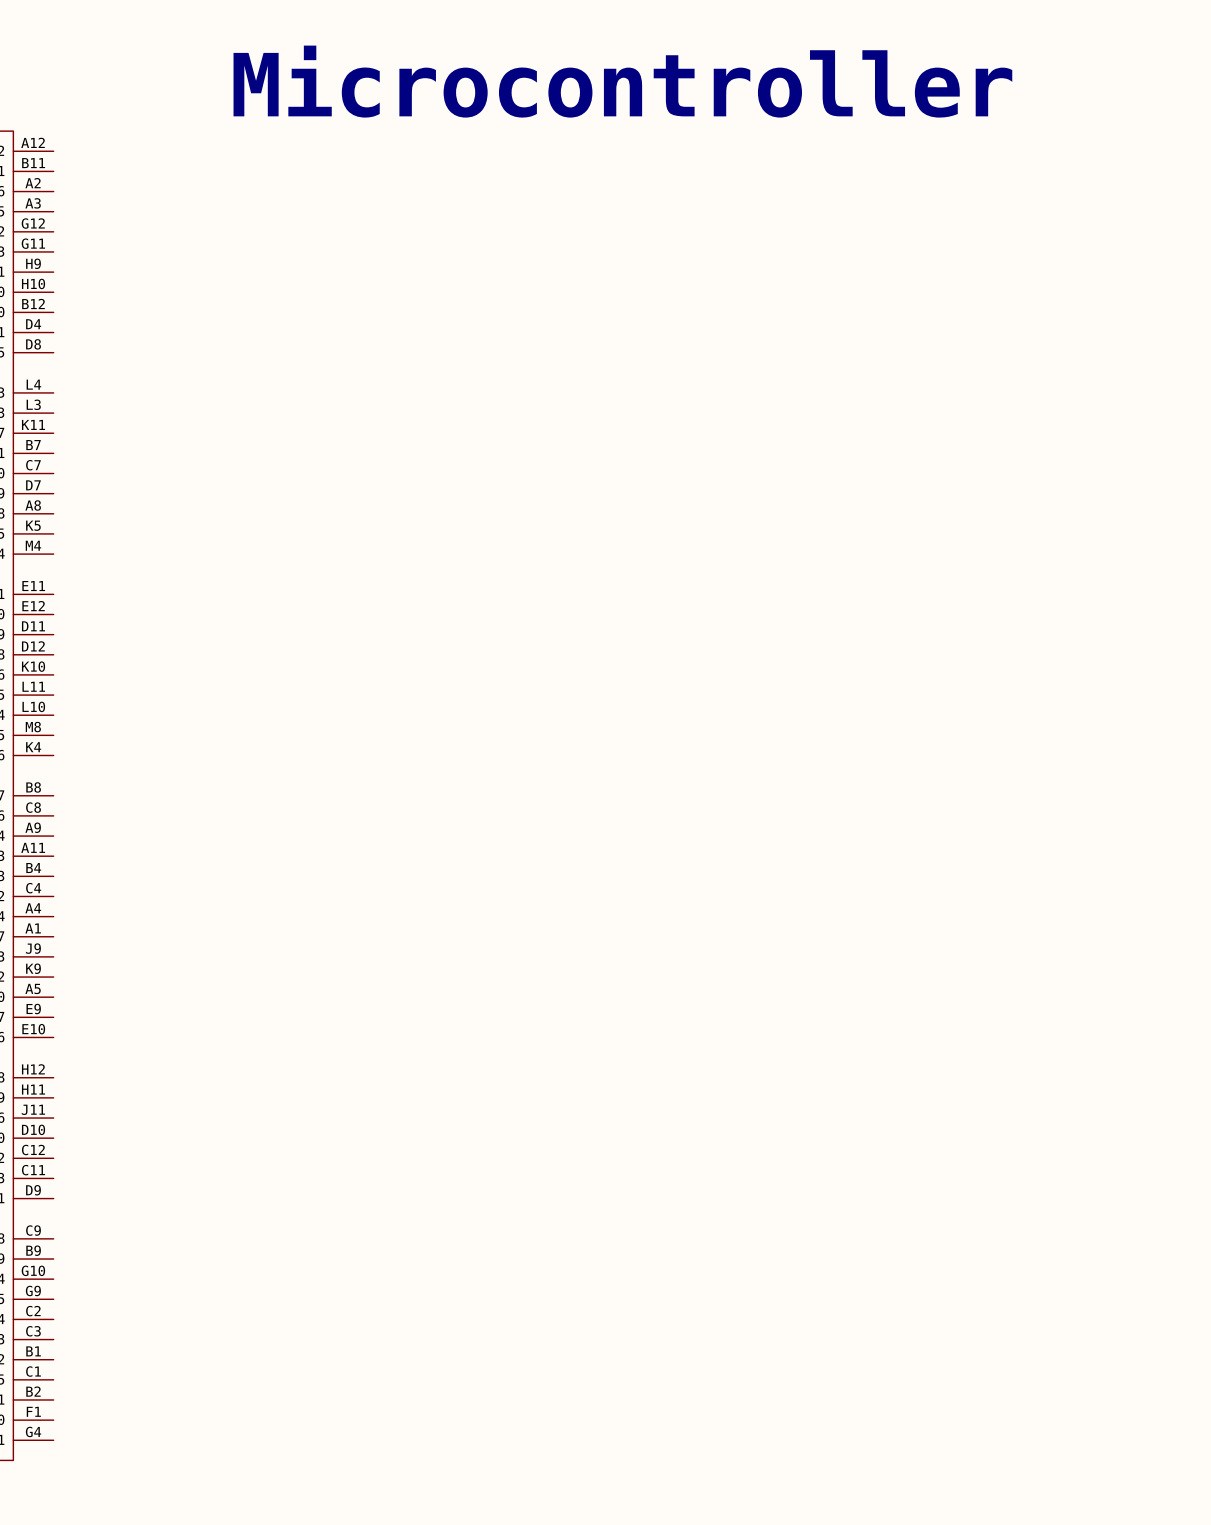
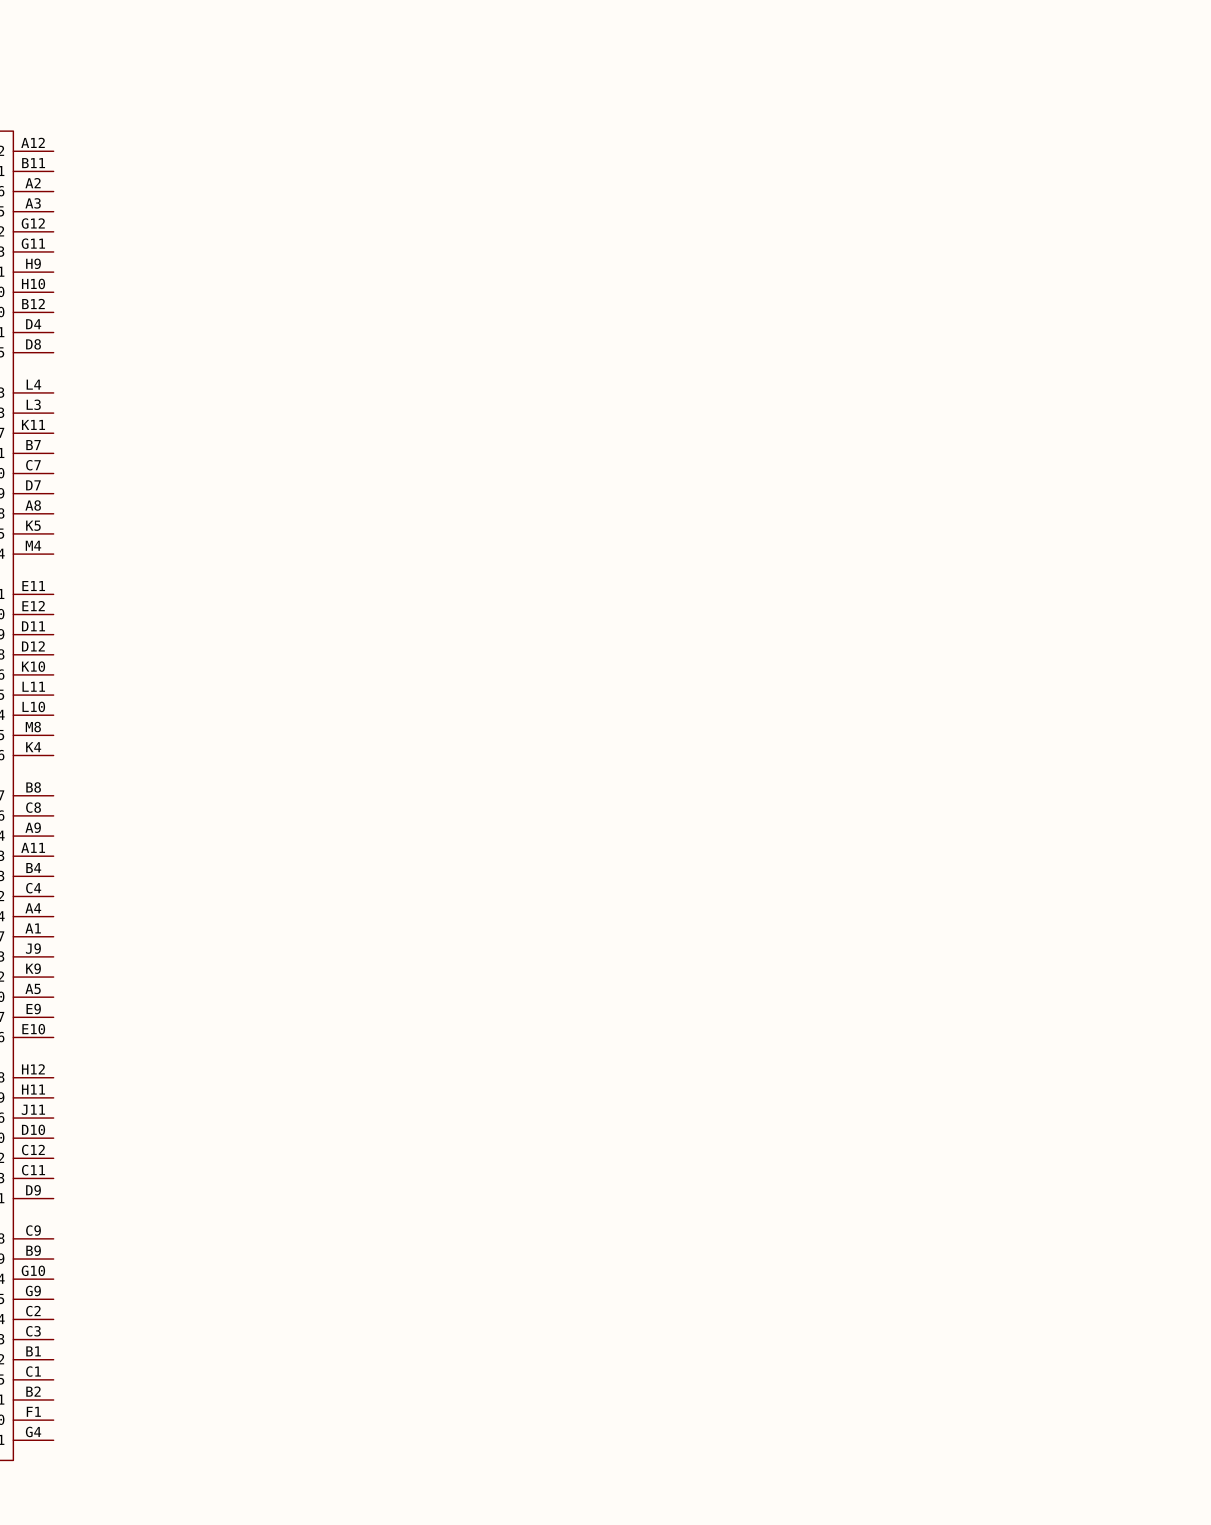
text: Microcontroller (622, 81) -> none

